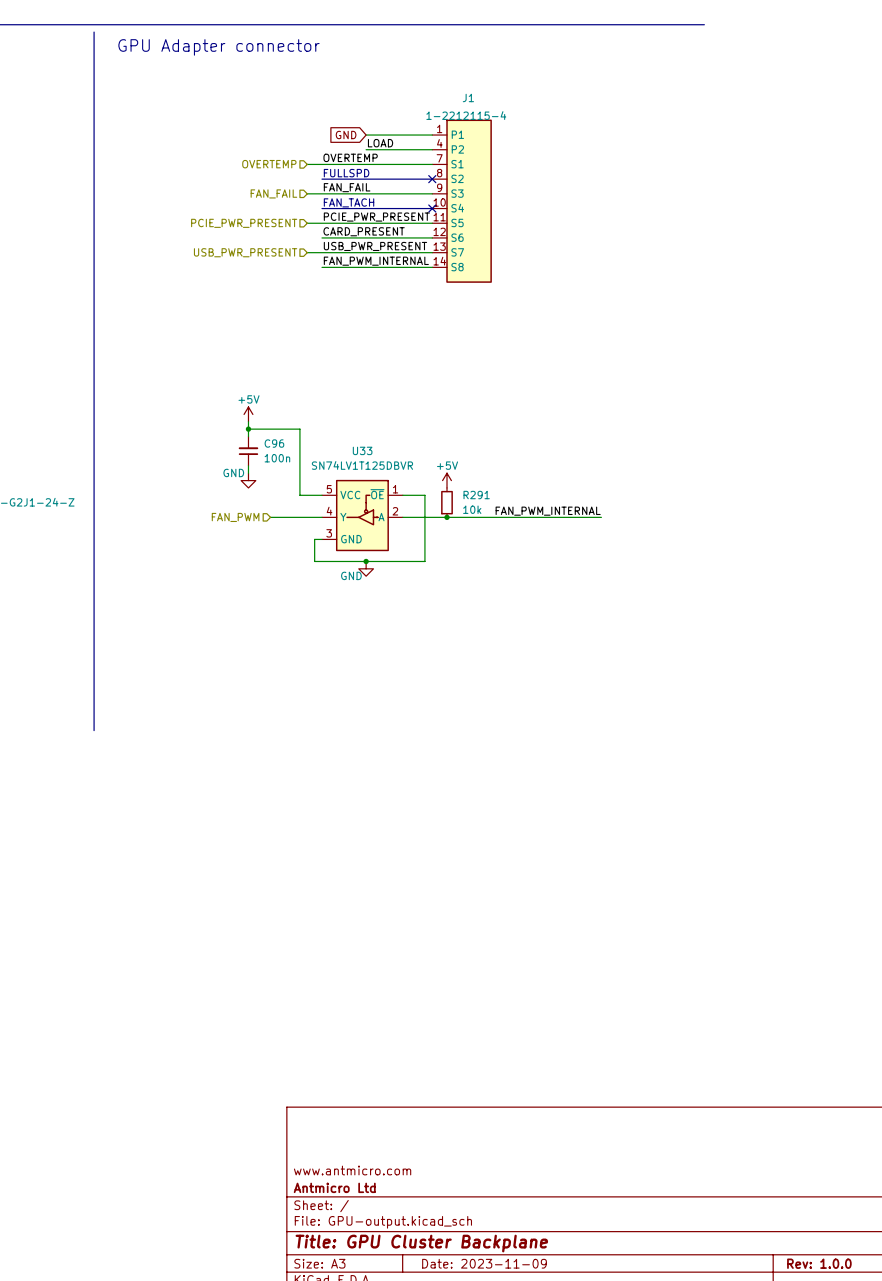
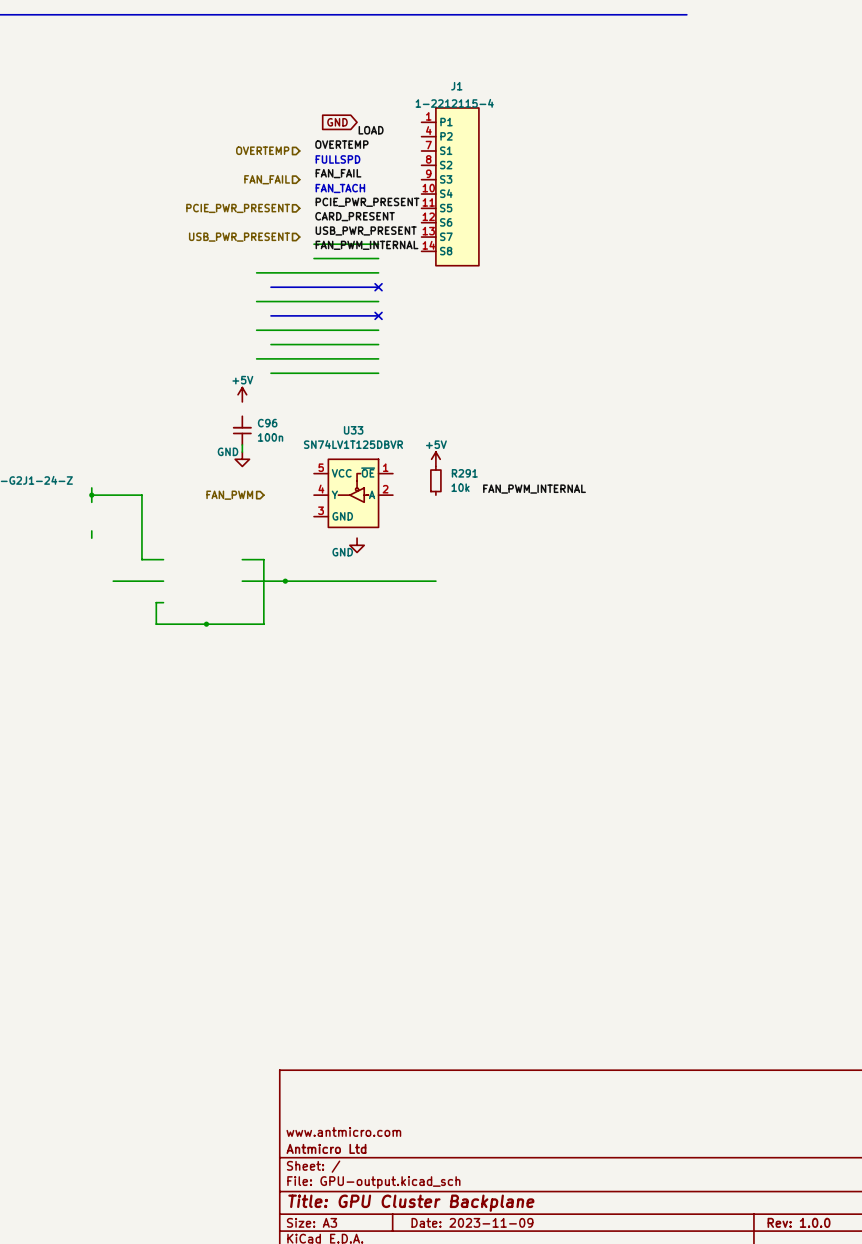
line: (94, 32) (94, 730) -> none
text: GPU Adapter connector (218, 47) -> none
wire: (366, 135) (432, 135) -> (314, 244) (378, 244)
wire: (366, 149) (432, 149) -> (314, 258) (378, 258)
wire: (307, 164) (432, 164) -> (256, 272) (378, 272)
line: (322, 179) (432, 179) -> (271, 287) (378, 287)
no-connect mark: (432, 179) -> none
wire: (307, 193) (432, 193) -> (256, 301) (378, 301)
line: (322, 208) (432, 208) -> (271, 315) (378, 315)
no-connect mark: (432, 208) -> none
wire: (307, 223) (432, 223) -> (256, 330) (378, 330)
wire: (322, 237) (432, 237) -> (271, 344) (378, 344)
wire: (307, 252) (432, 252) -> (256, 358) (378, 358)
wire: (322, 267) (432, 267) -> (271, 373) (378, 373)
no-connect mark: none -> (378, 287)
no-connect mark: none -> (378, 315)
wire: (248, 421) (248, 436) -> none
wire: (248, 429) (299, 429) (299, 495) (322, 495) -> none
junction: (248, 429) -> none
wire: (402, 495) (424, 495) (424, 561) (314, 561) (314, 539) (322, 539) -> none
wire: none -> (91, 495) (141, 495) (141, 559) (163, 559)
junction: none -> (91, 495)
wire: (270, 517) (322, 517) -> none
wire: (402, 517) (601, 517) -> none
junction: (447, 517) -> none
junction: (366, 561) -> none
wire: none -> (242, 559) (263, 559) (263, 624) (156, 624) (156, 602) (163, 602)
wire: none -> (113, 581) (163, 581)
wire: none -> (242, 581) (435, 581)
junction: none -> (285, 581)
junction: none -> (206, 624)

